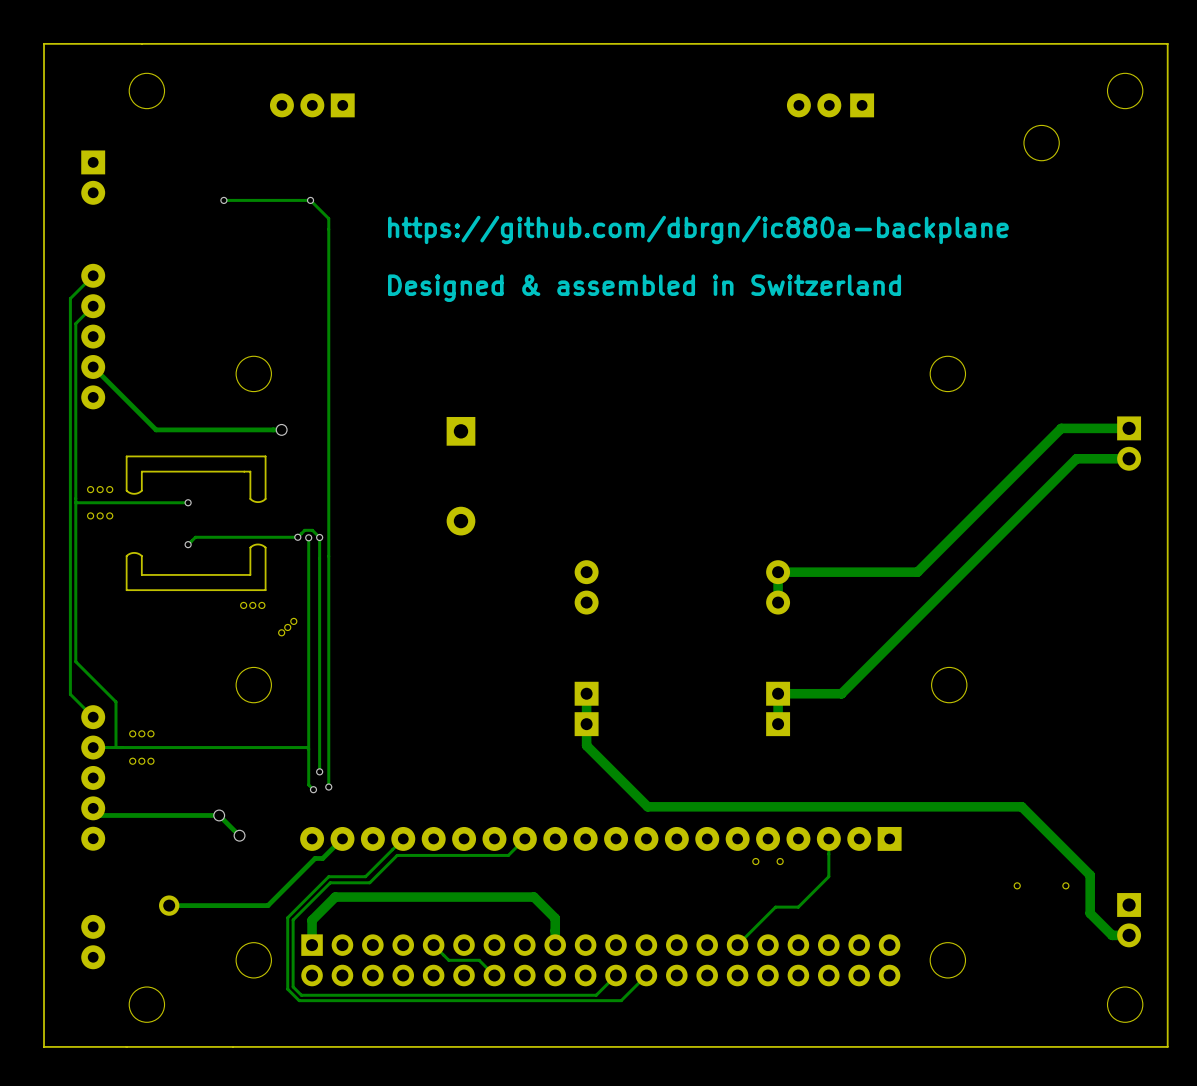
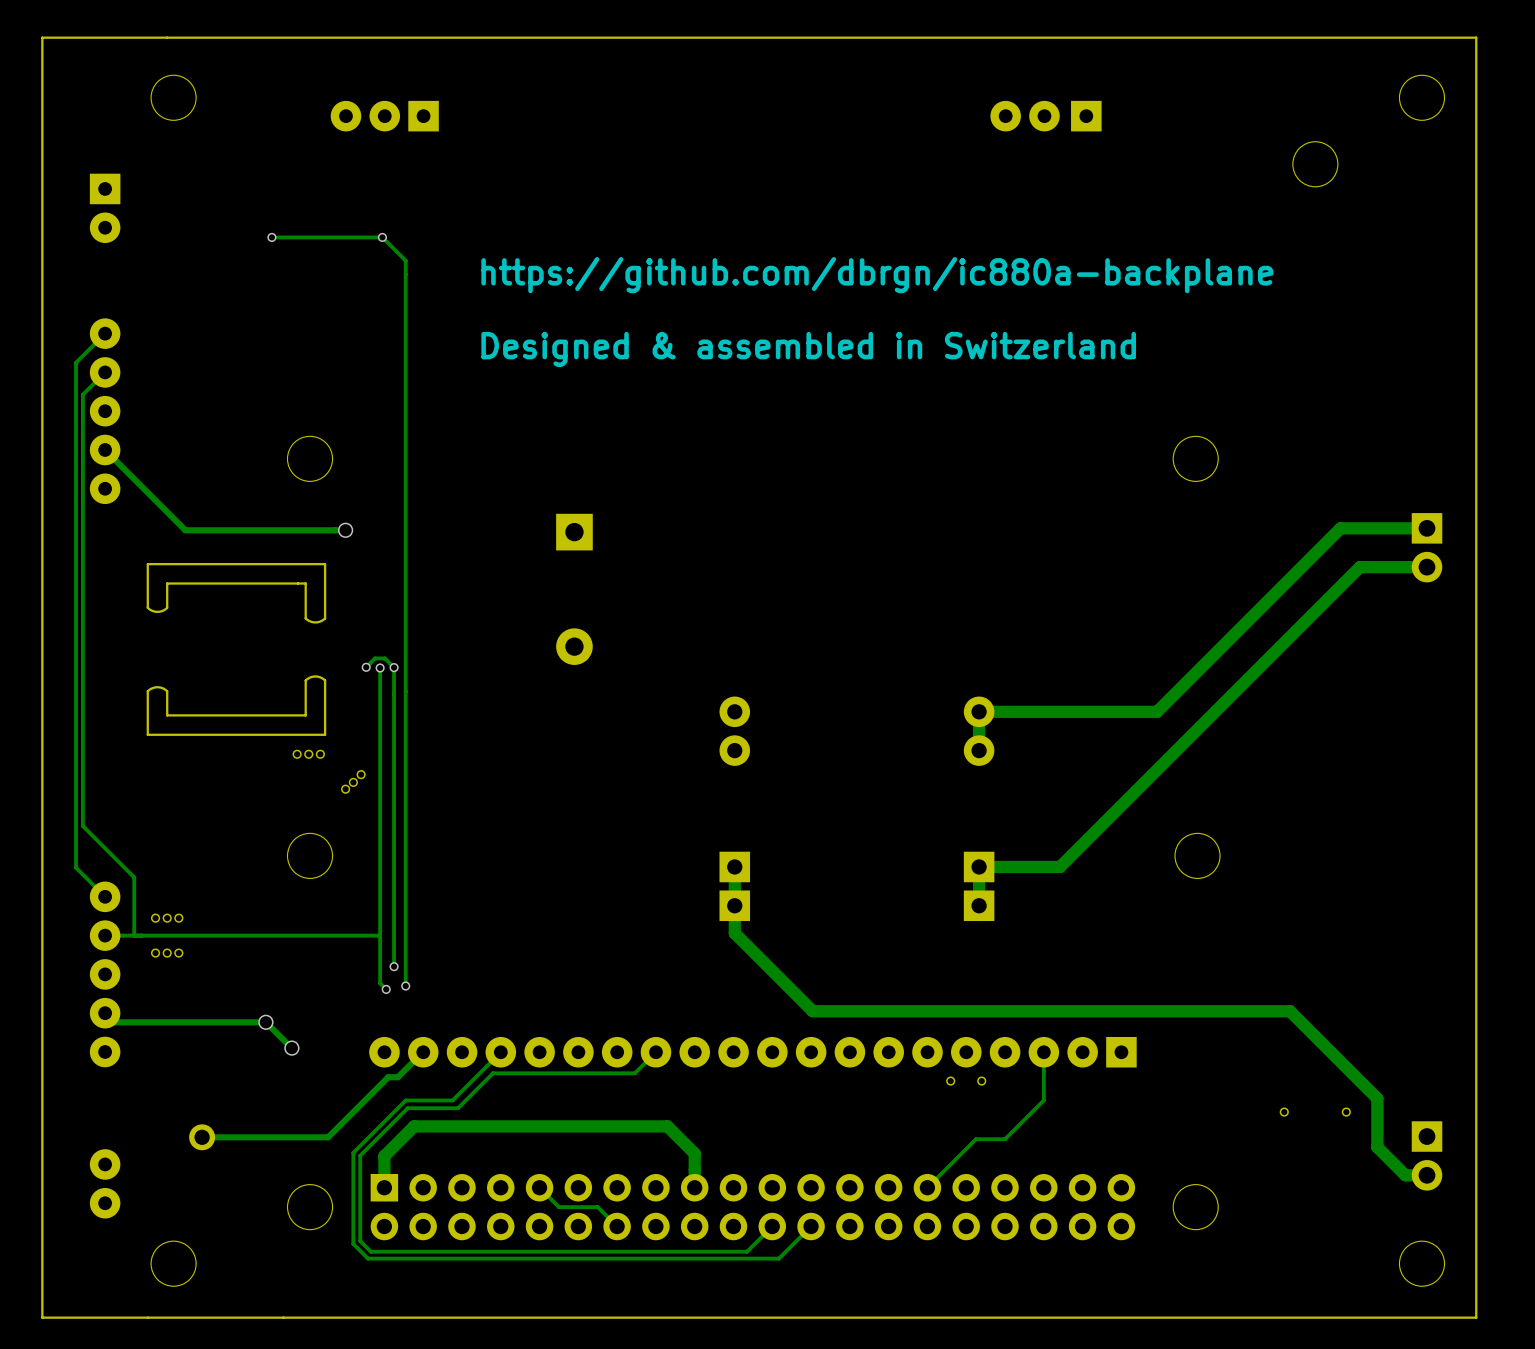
part: (90, 489) -> none
part: (100, 489) -> none
part: (109, 489) -> none
track: (188, 502) (75, 502) -> none
via: (188, 502) -> none
part: (90, 515) -> none
part: (100, 515) -> none
part: (109, 515) -> none
track: (297, 537) (195, 537) (188, 544) -> none
via: (188, 544) -> none

